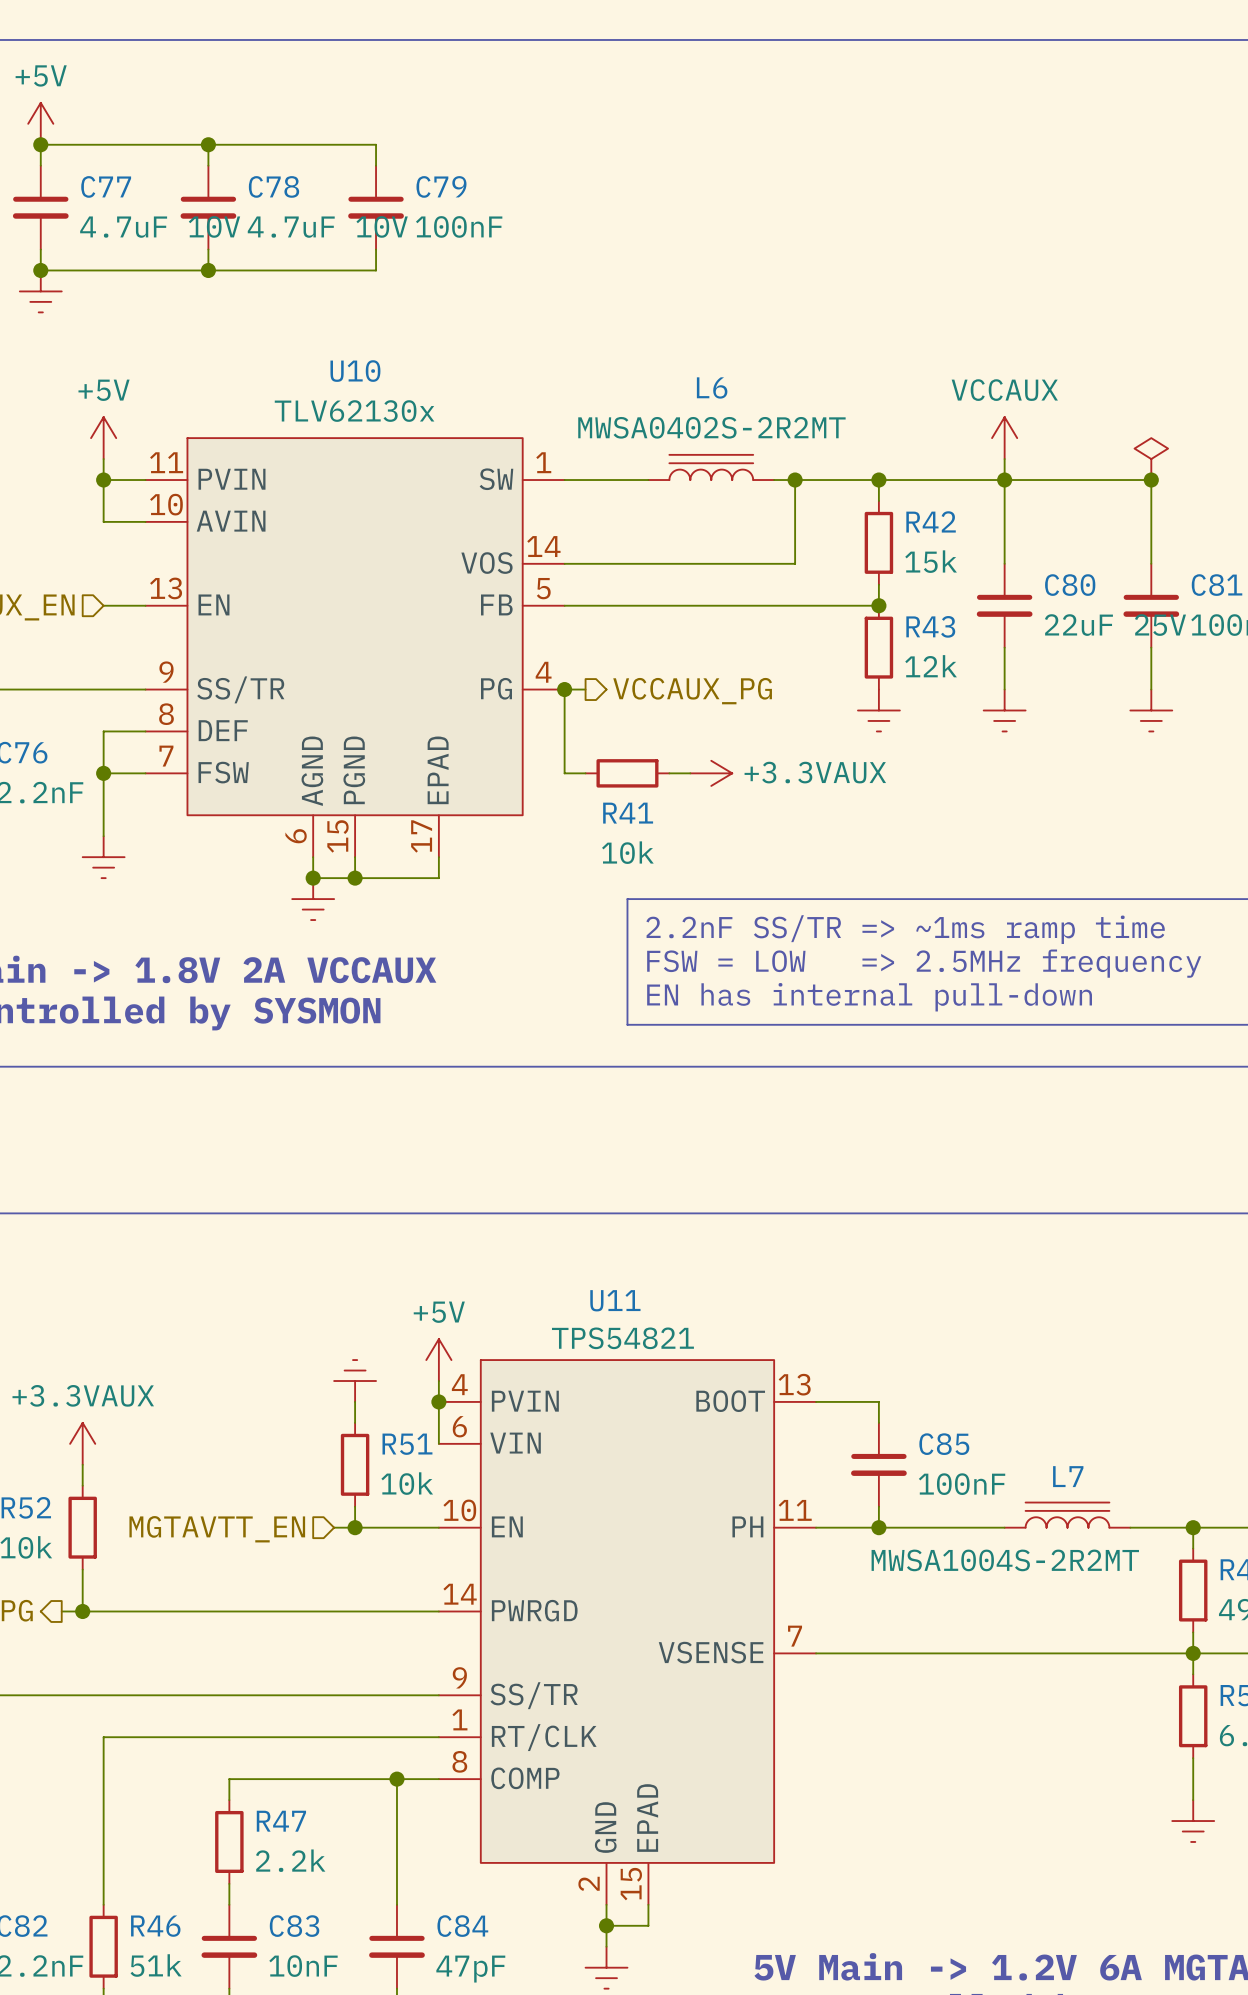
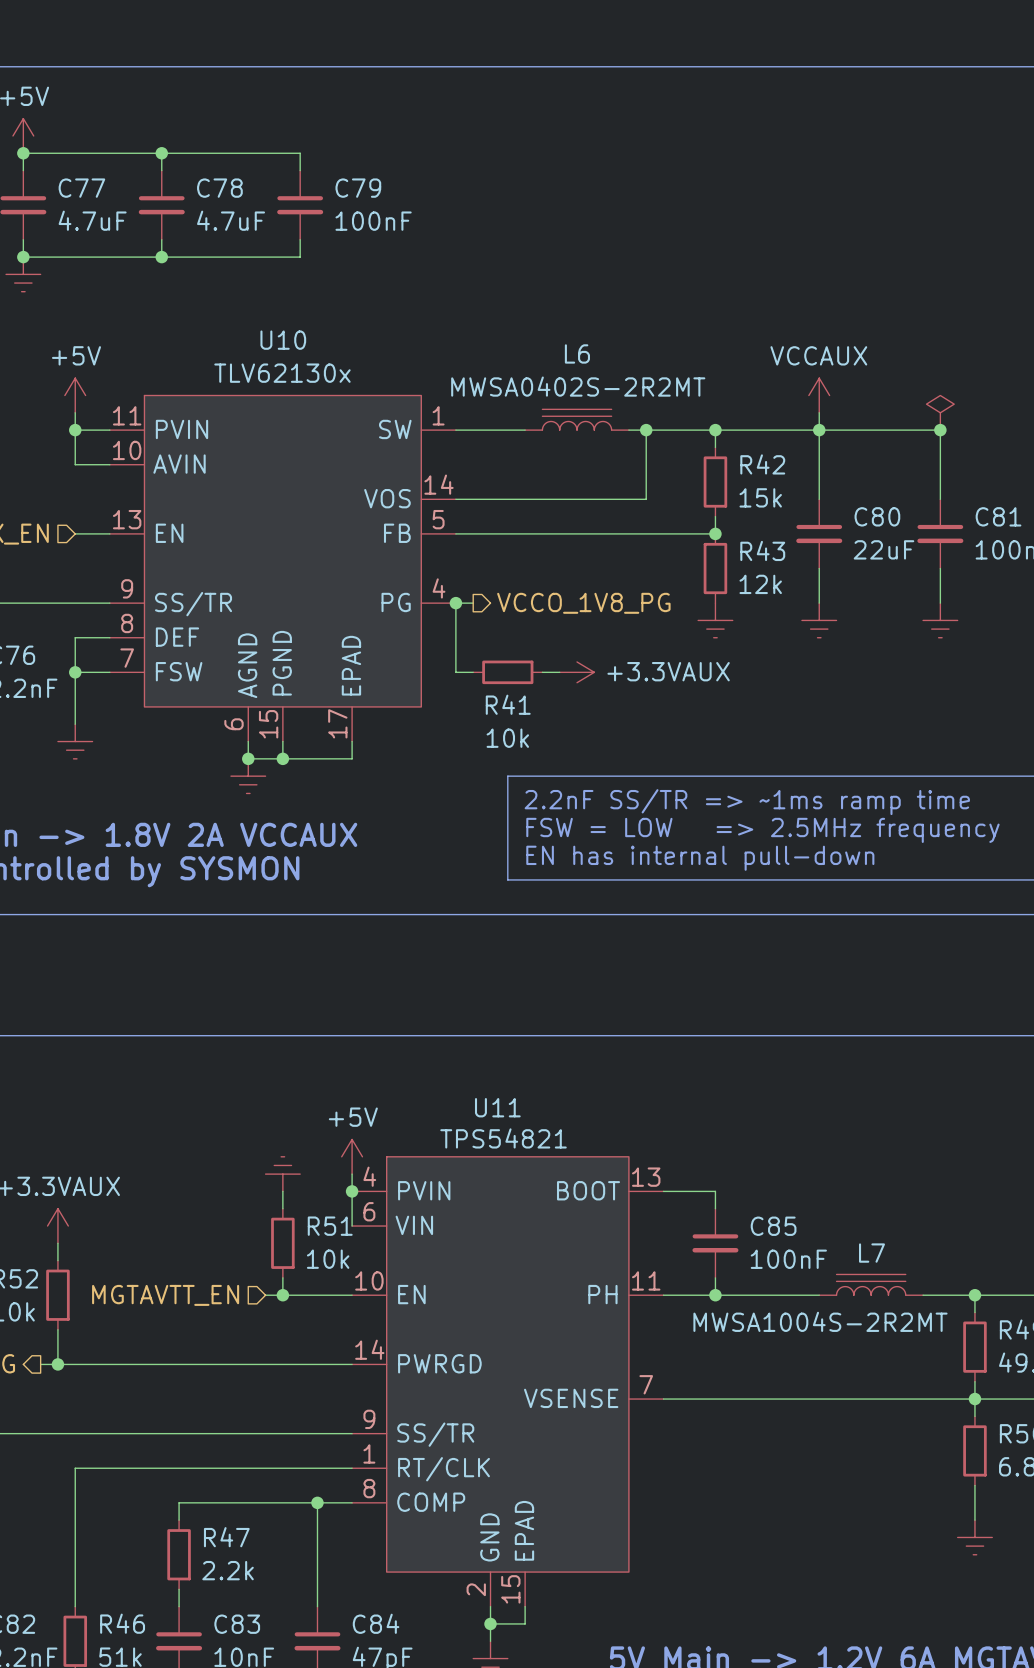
C77 value: 4.7uF 10V (160, 226) -> 4.7uF (92, 220)
C78 value: 4.7uF 10V (327, 226) -> 4.7uF (231, 220)
C80 value: 22uF 25V (1115, 625) -> 22uF (884, 549)
hierarchical label: VCCAUX_PG (692, 691) -> VCCO_1V8_PG (583, 603)

